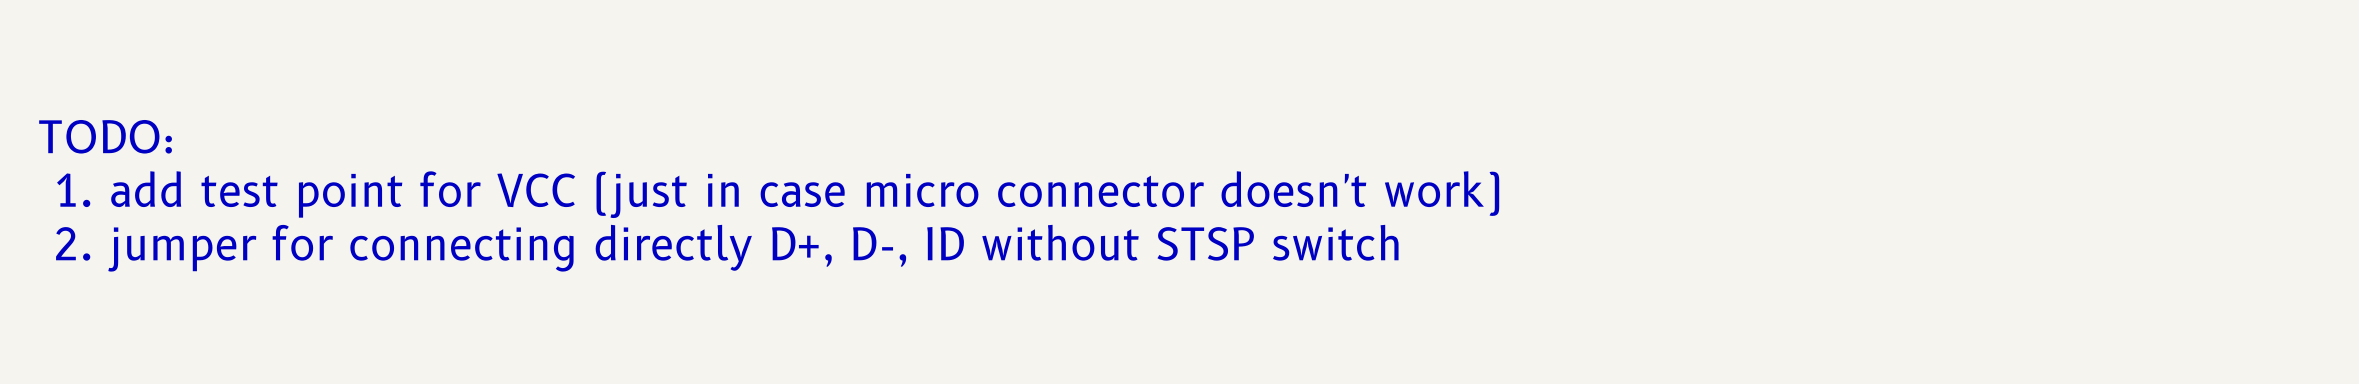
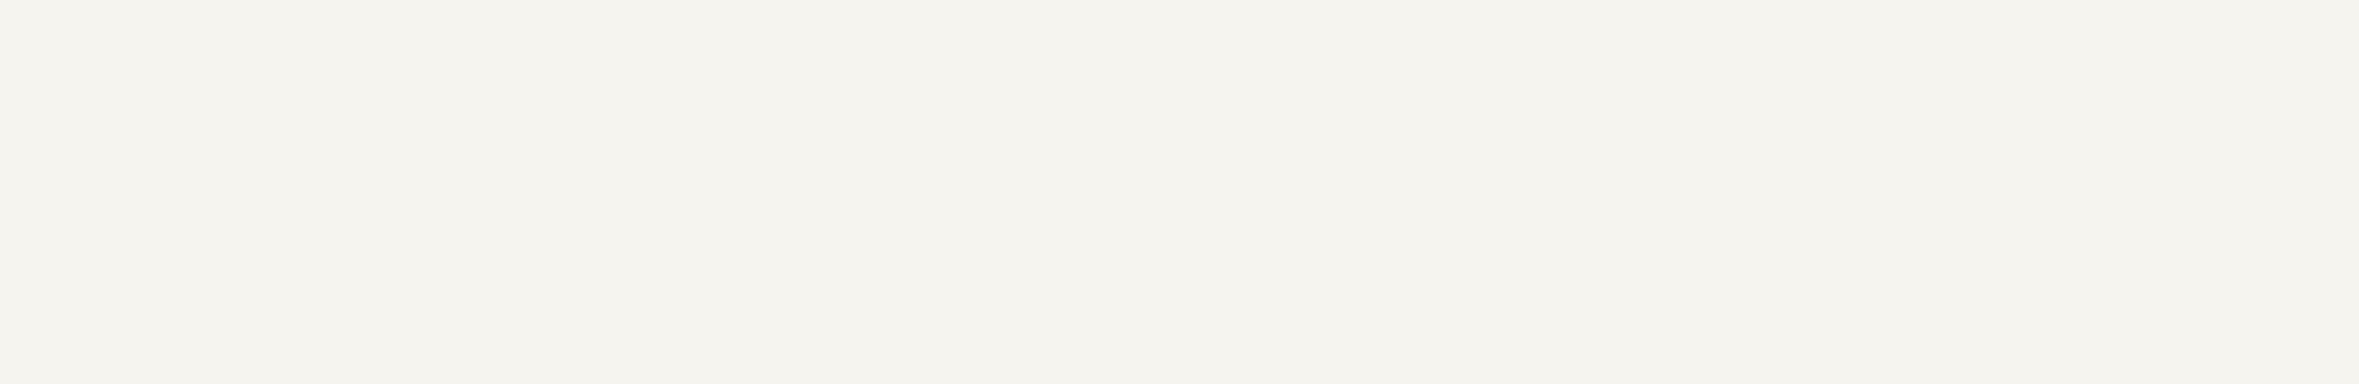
text: TODO: (105, 136) -> none
text: 1. add test point for VCC (just in case micro connector doesn't work) (778, 194) -> none
text: 2. jumper for connecting directly D+, D-, ID without STSP switch (727, 248) -> none

